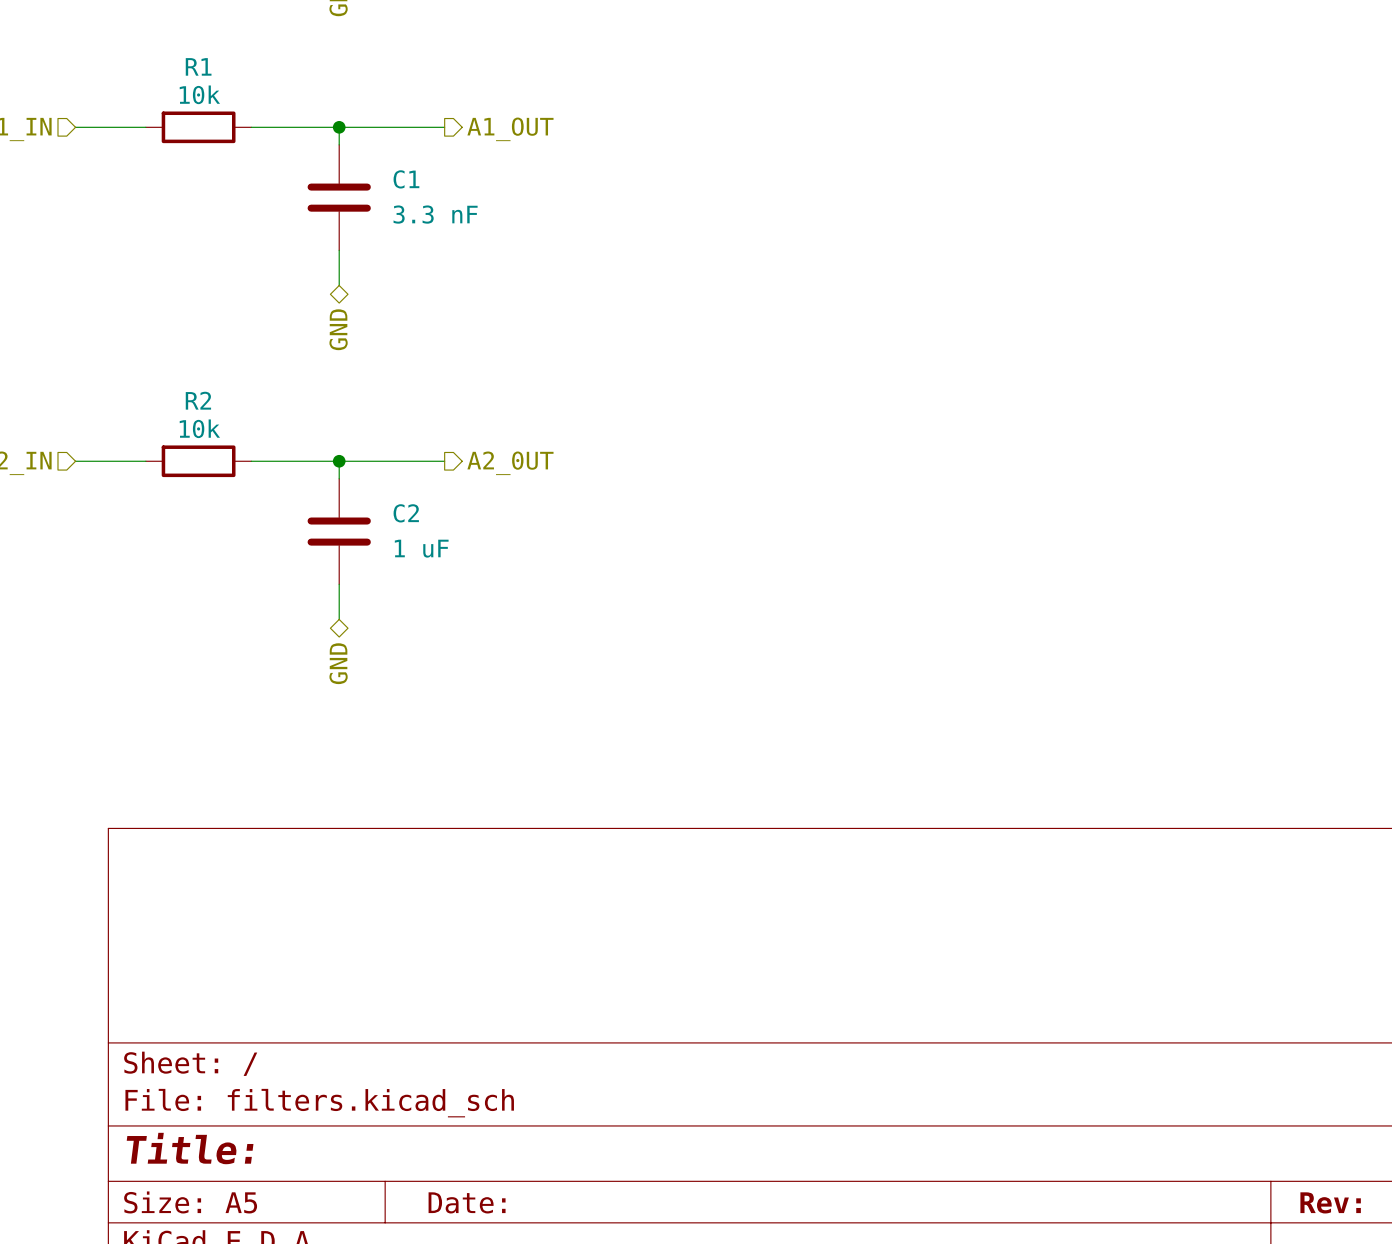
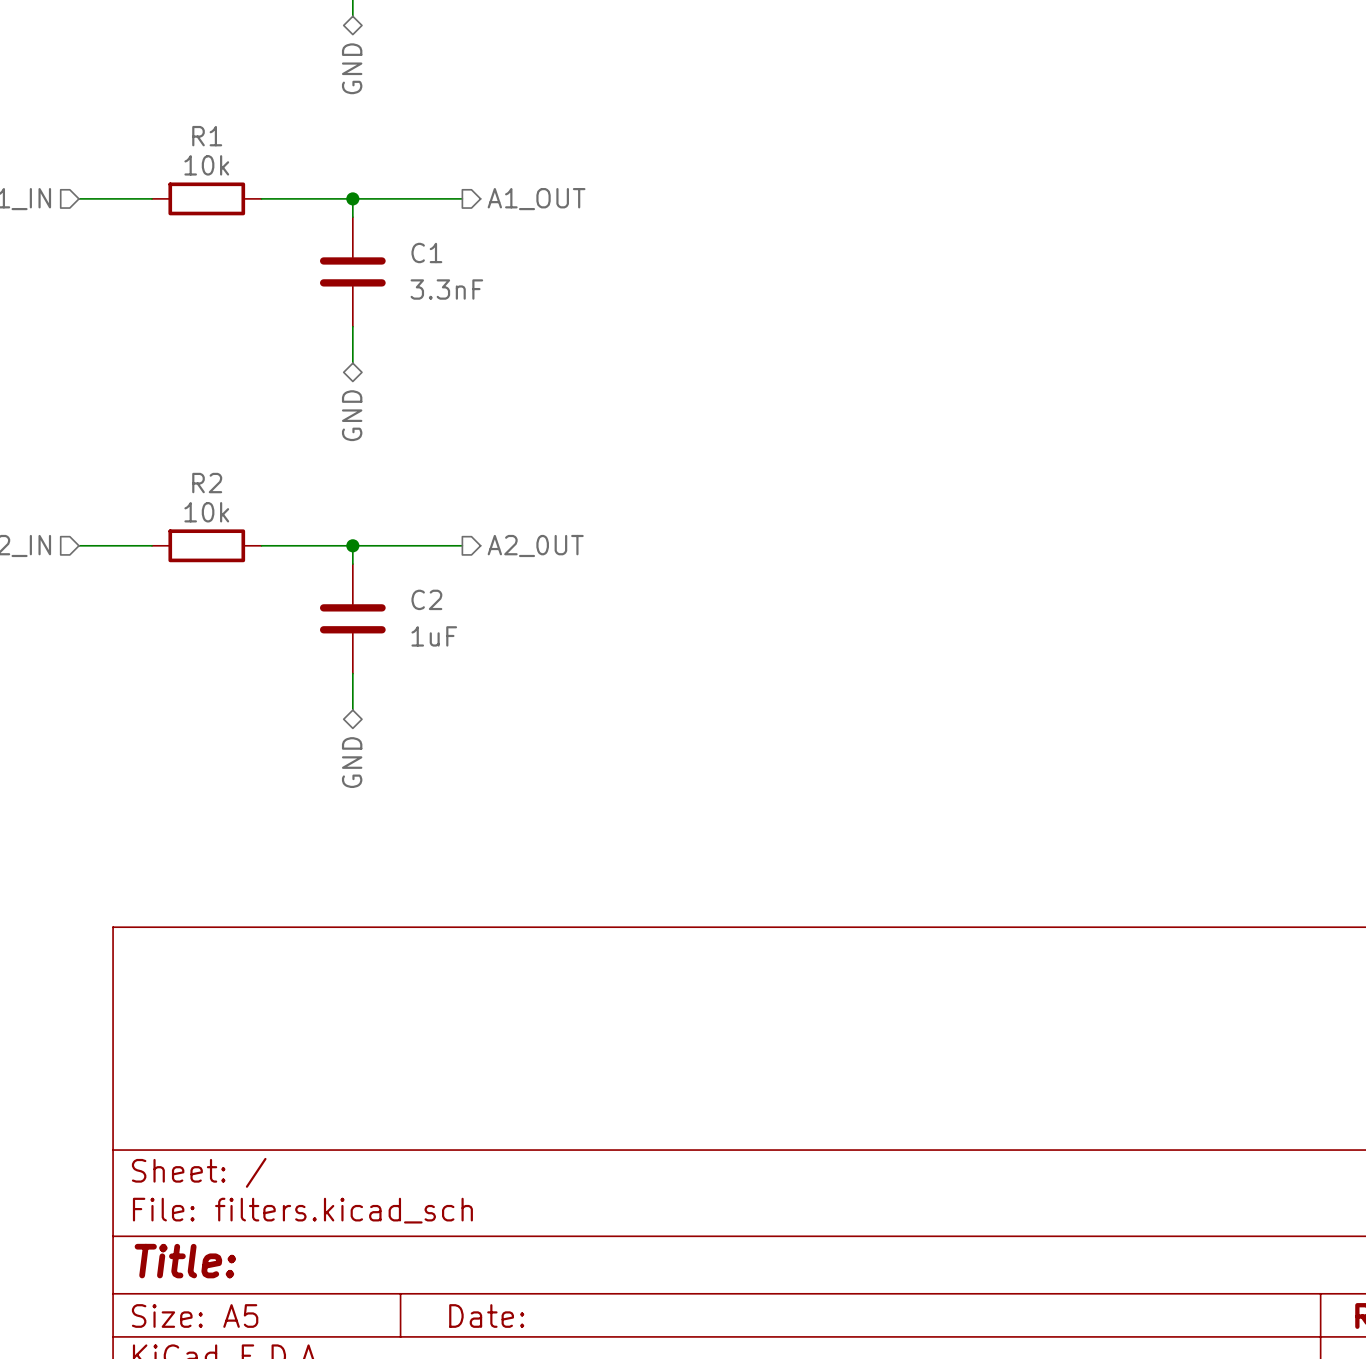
C1 value: 3.3 nF (435, 214) -> 3.3nF (446, 289)
C2 value: 1 uF (421, 548) -> 1uF (434, 636)

